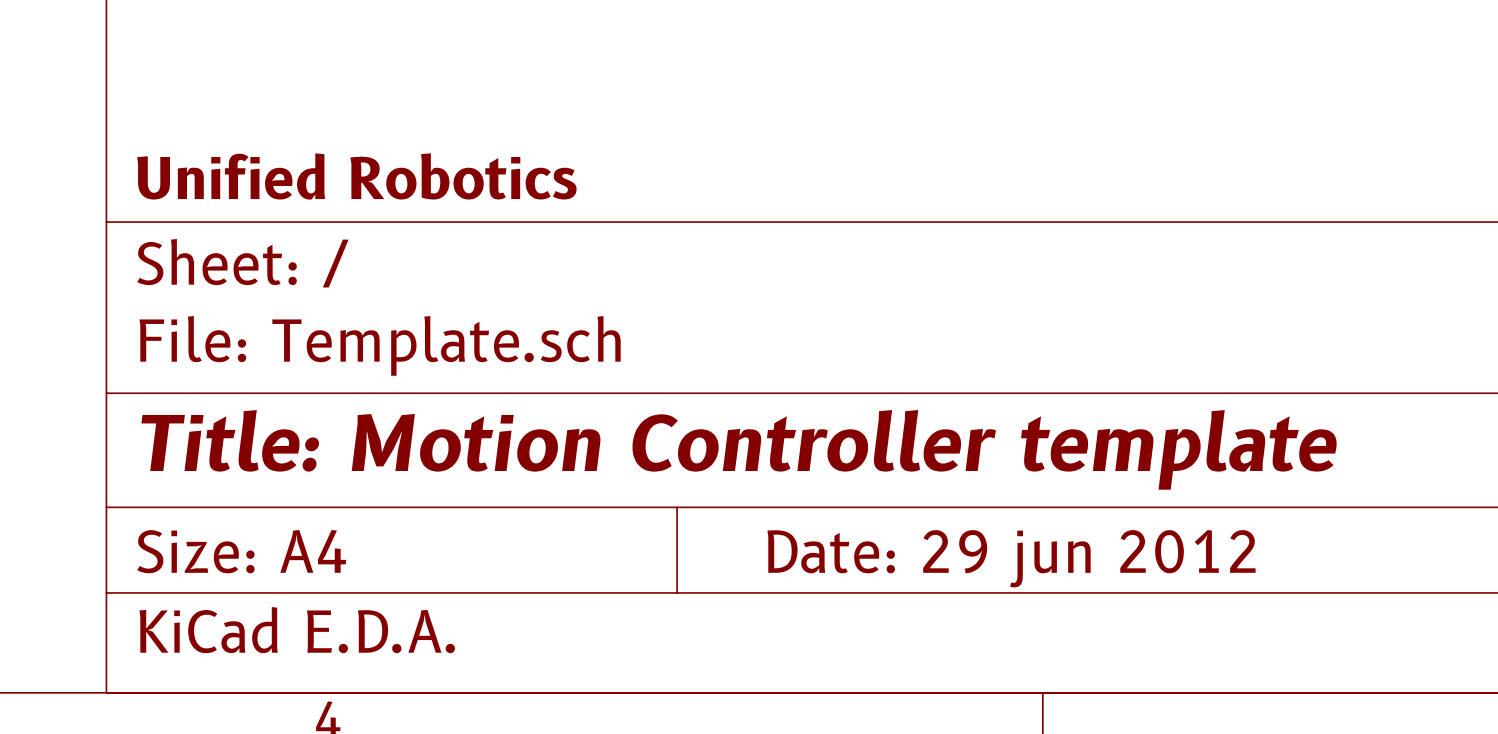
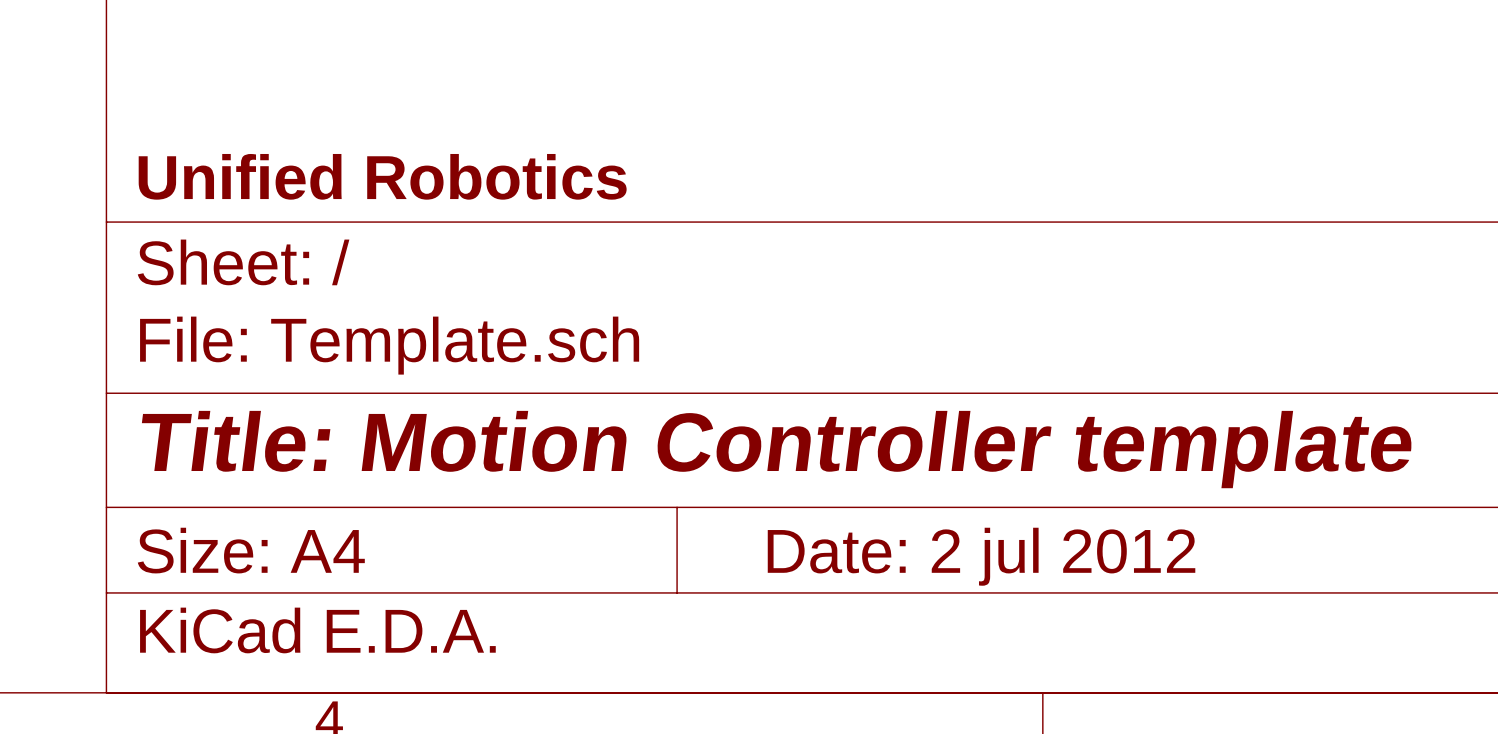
title block: Date: 29 jun 2012 (1011, 558) -> Date: 2 jul 2012 (981, 556)

